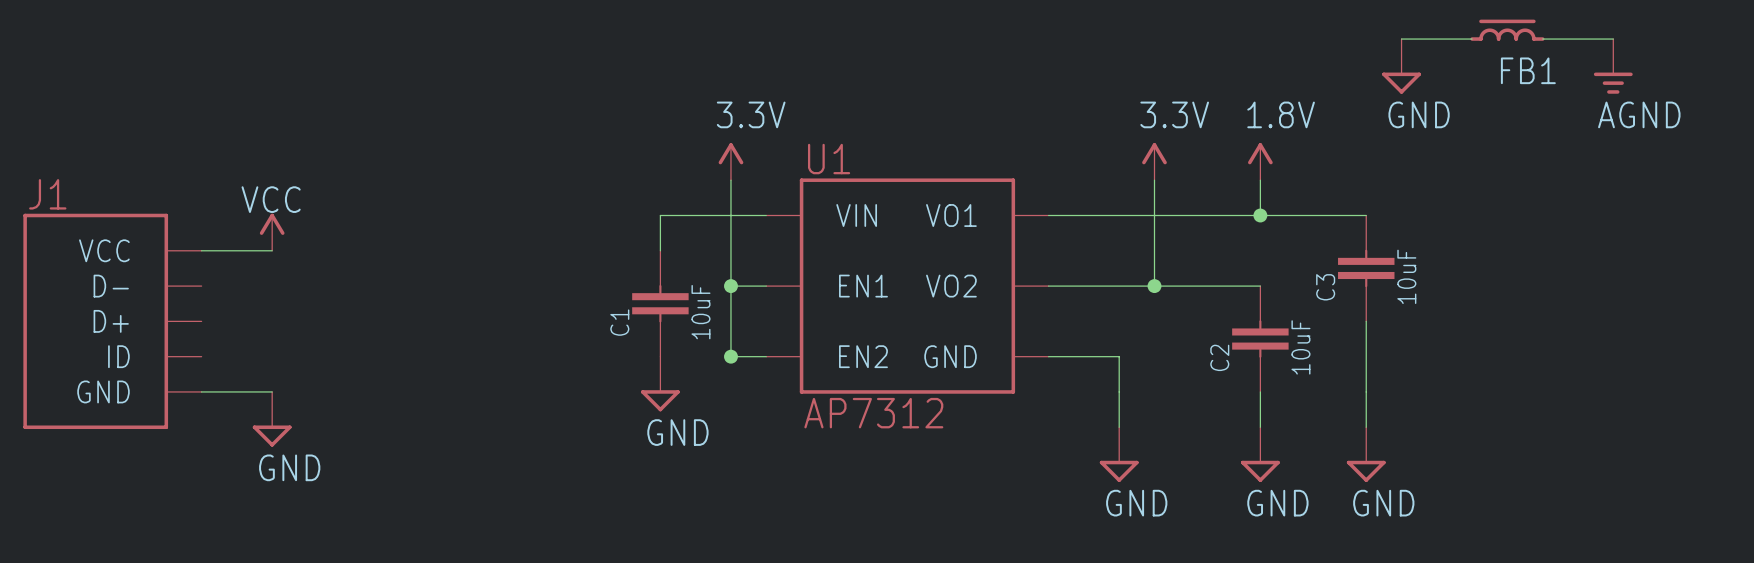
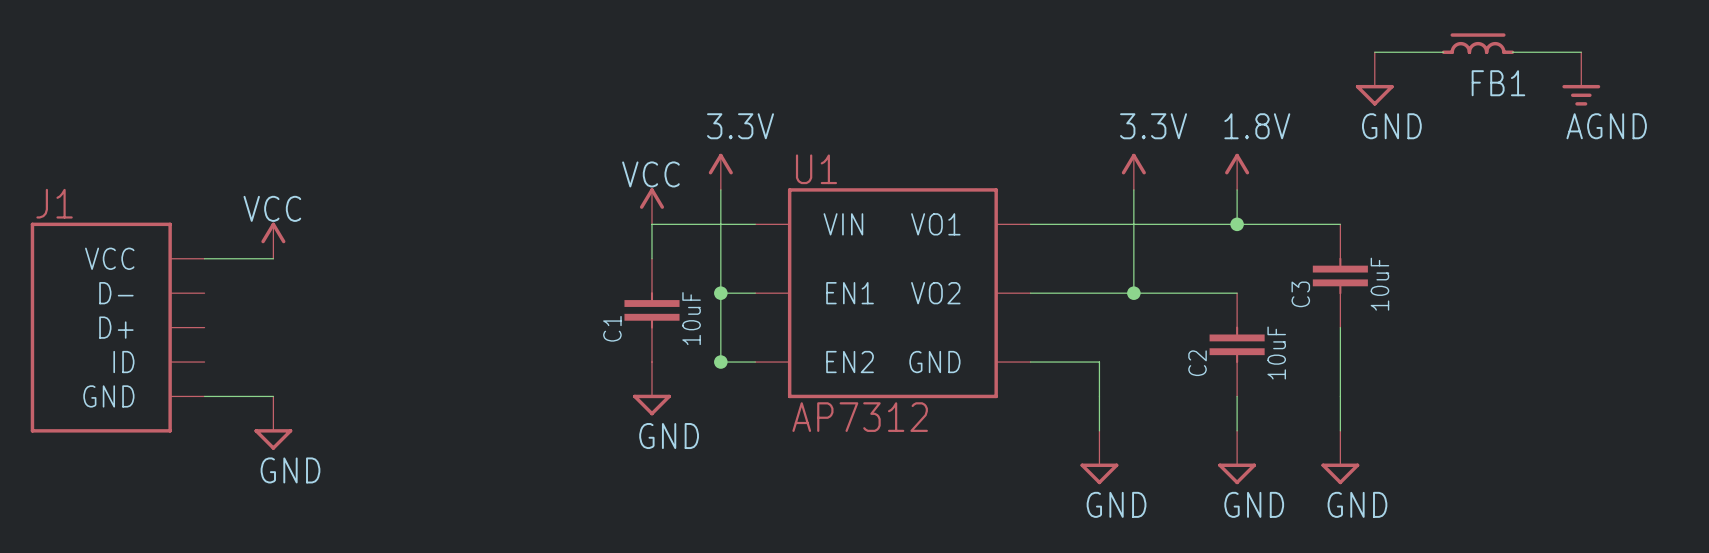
power symbol: none -> VCC (651, 206)

